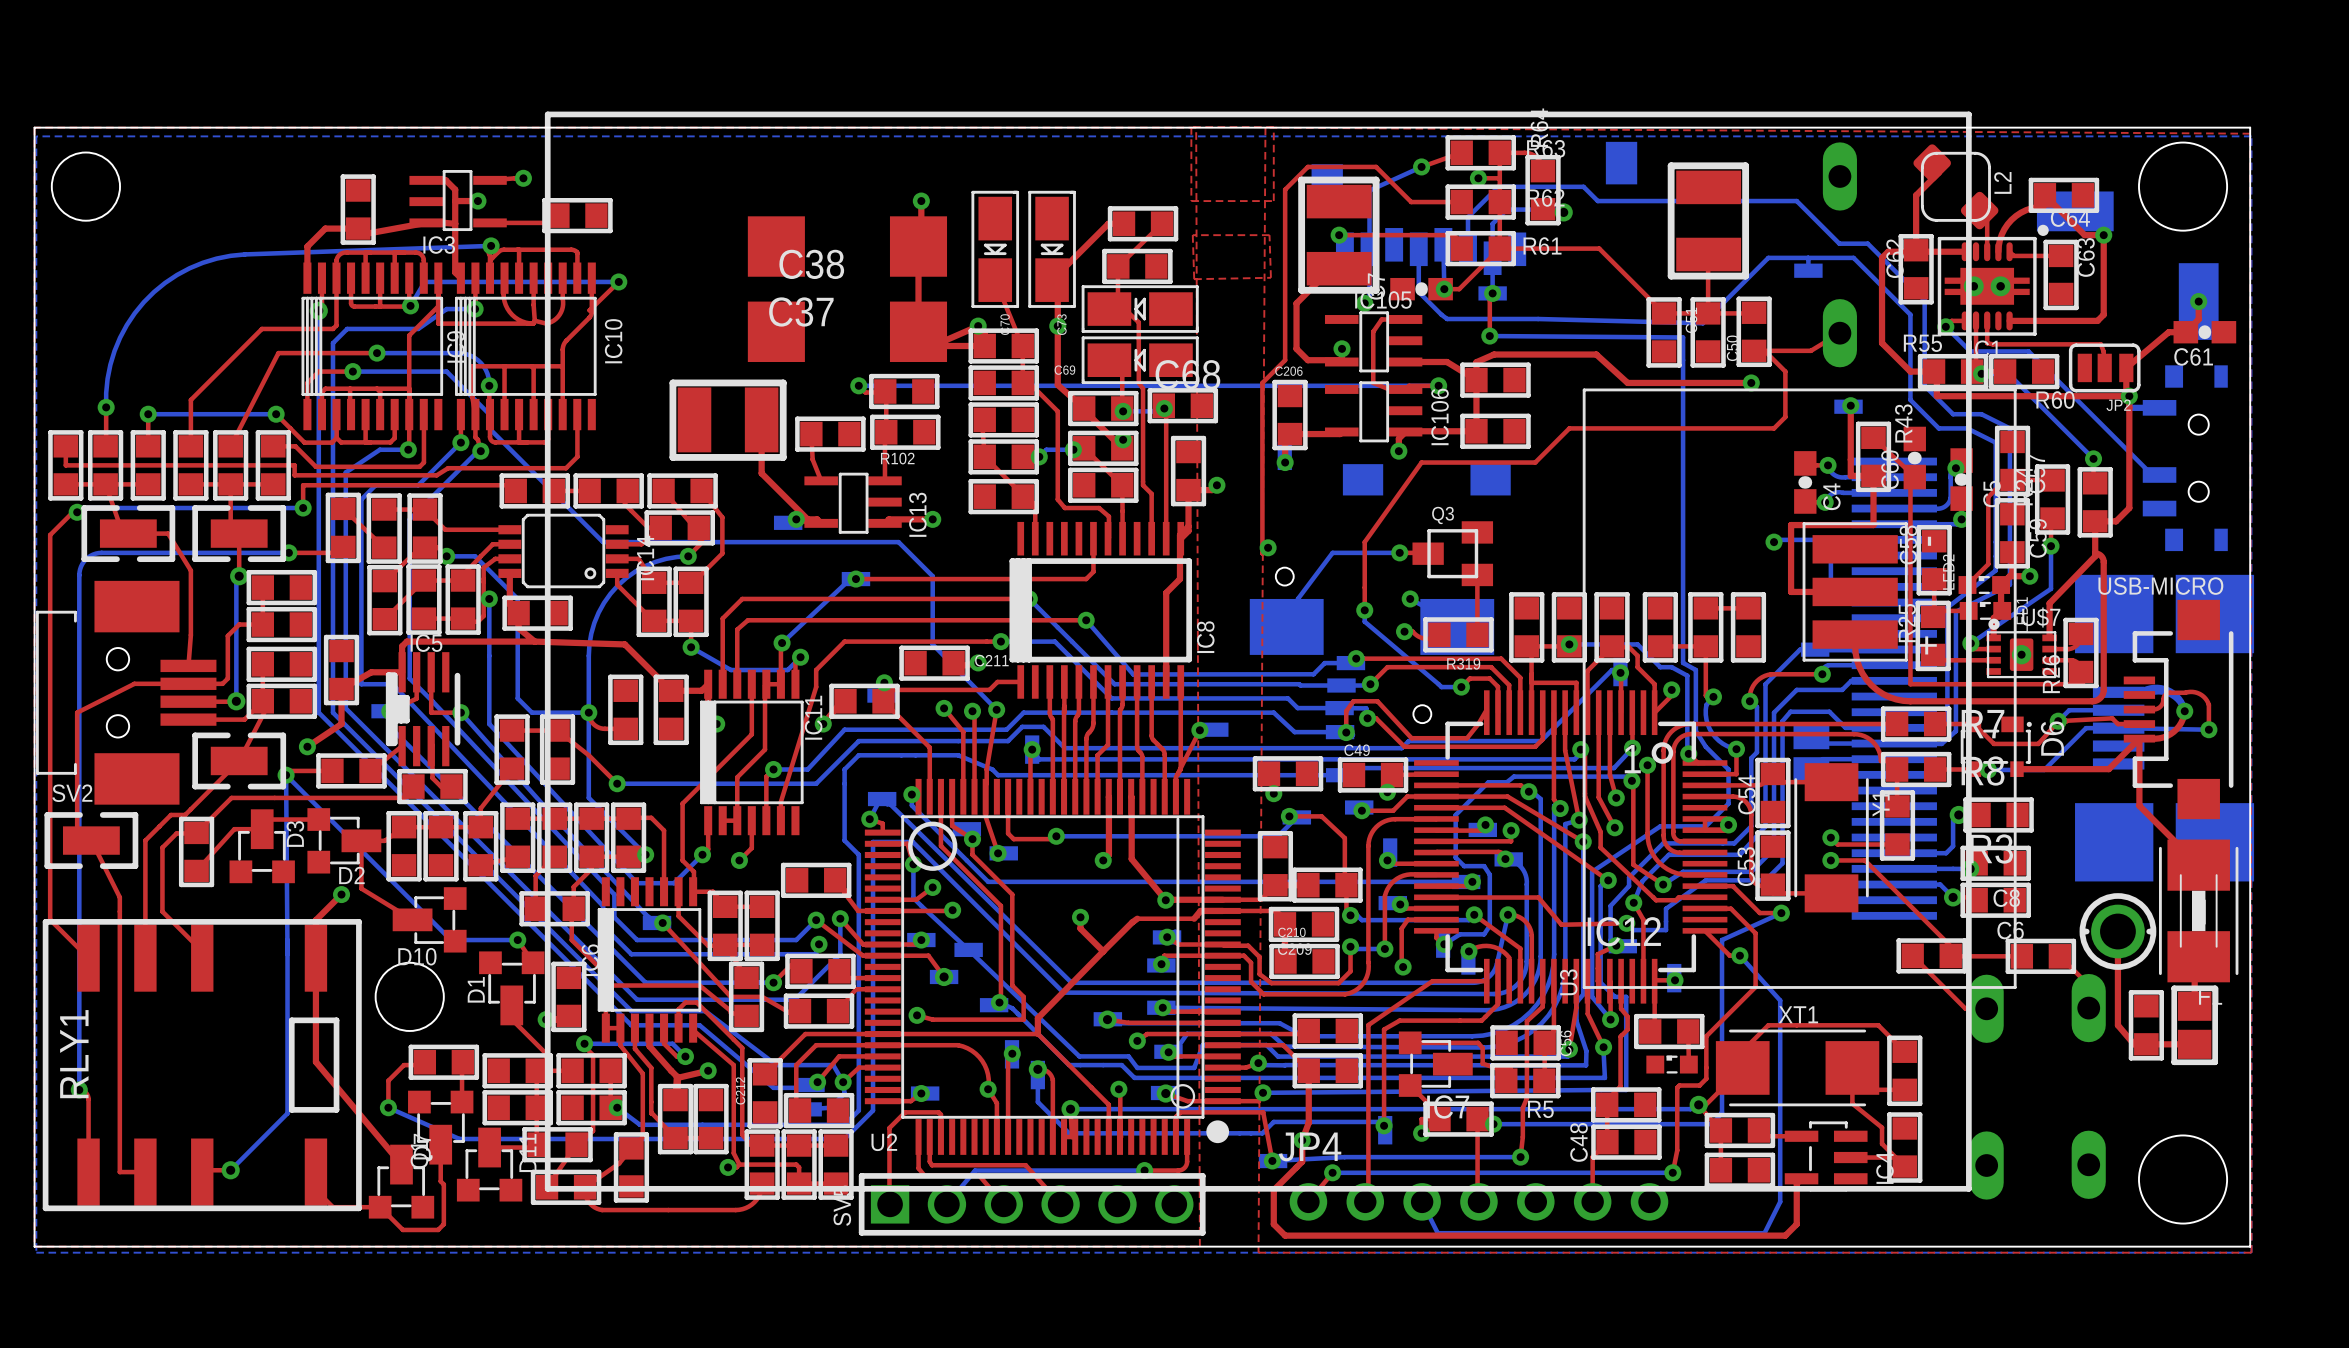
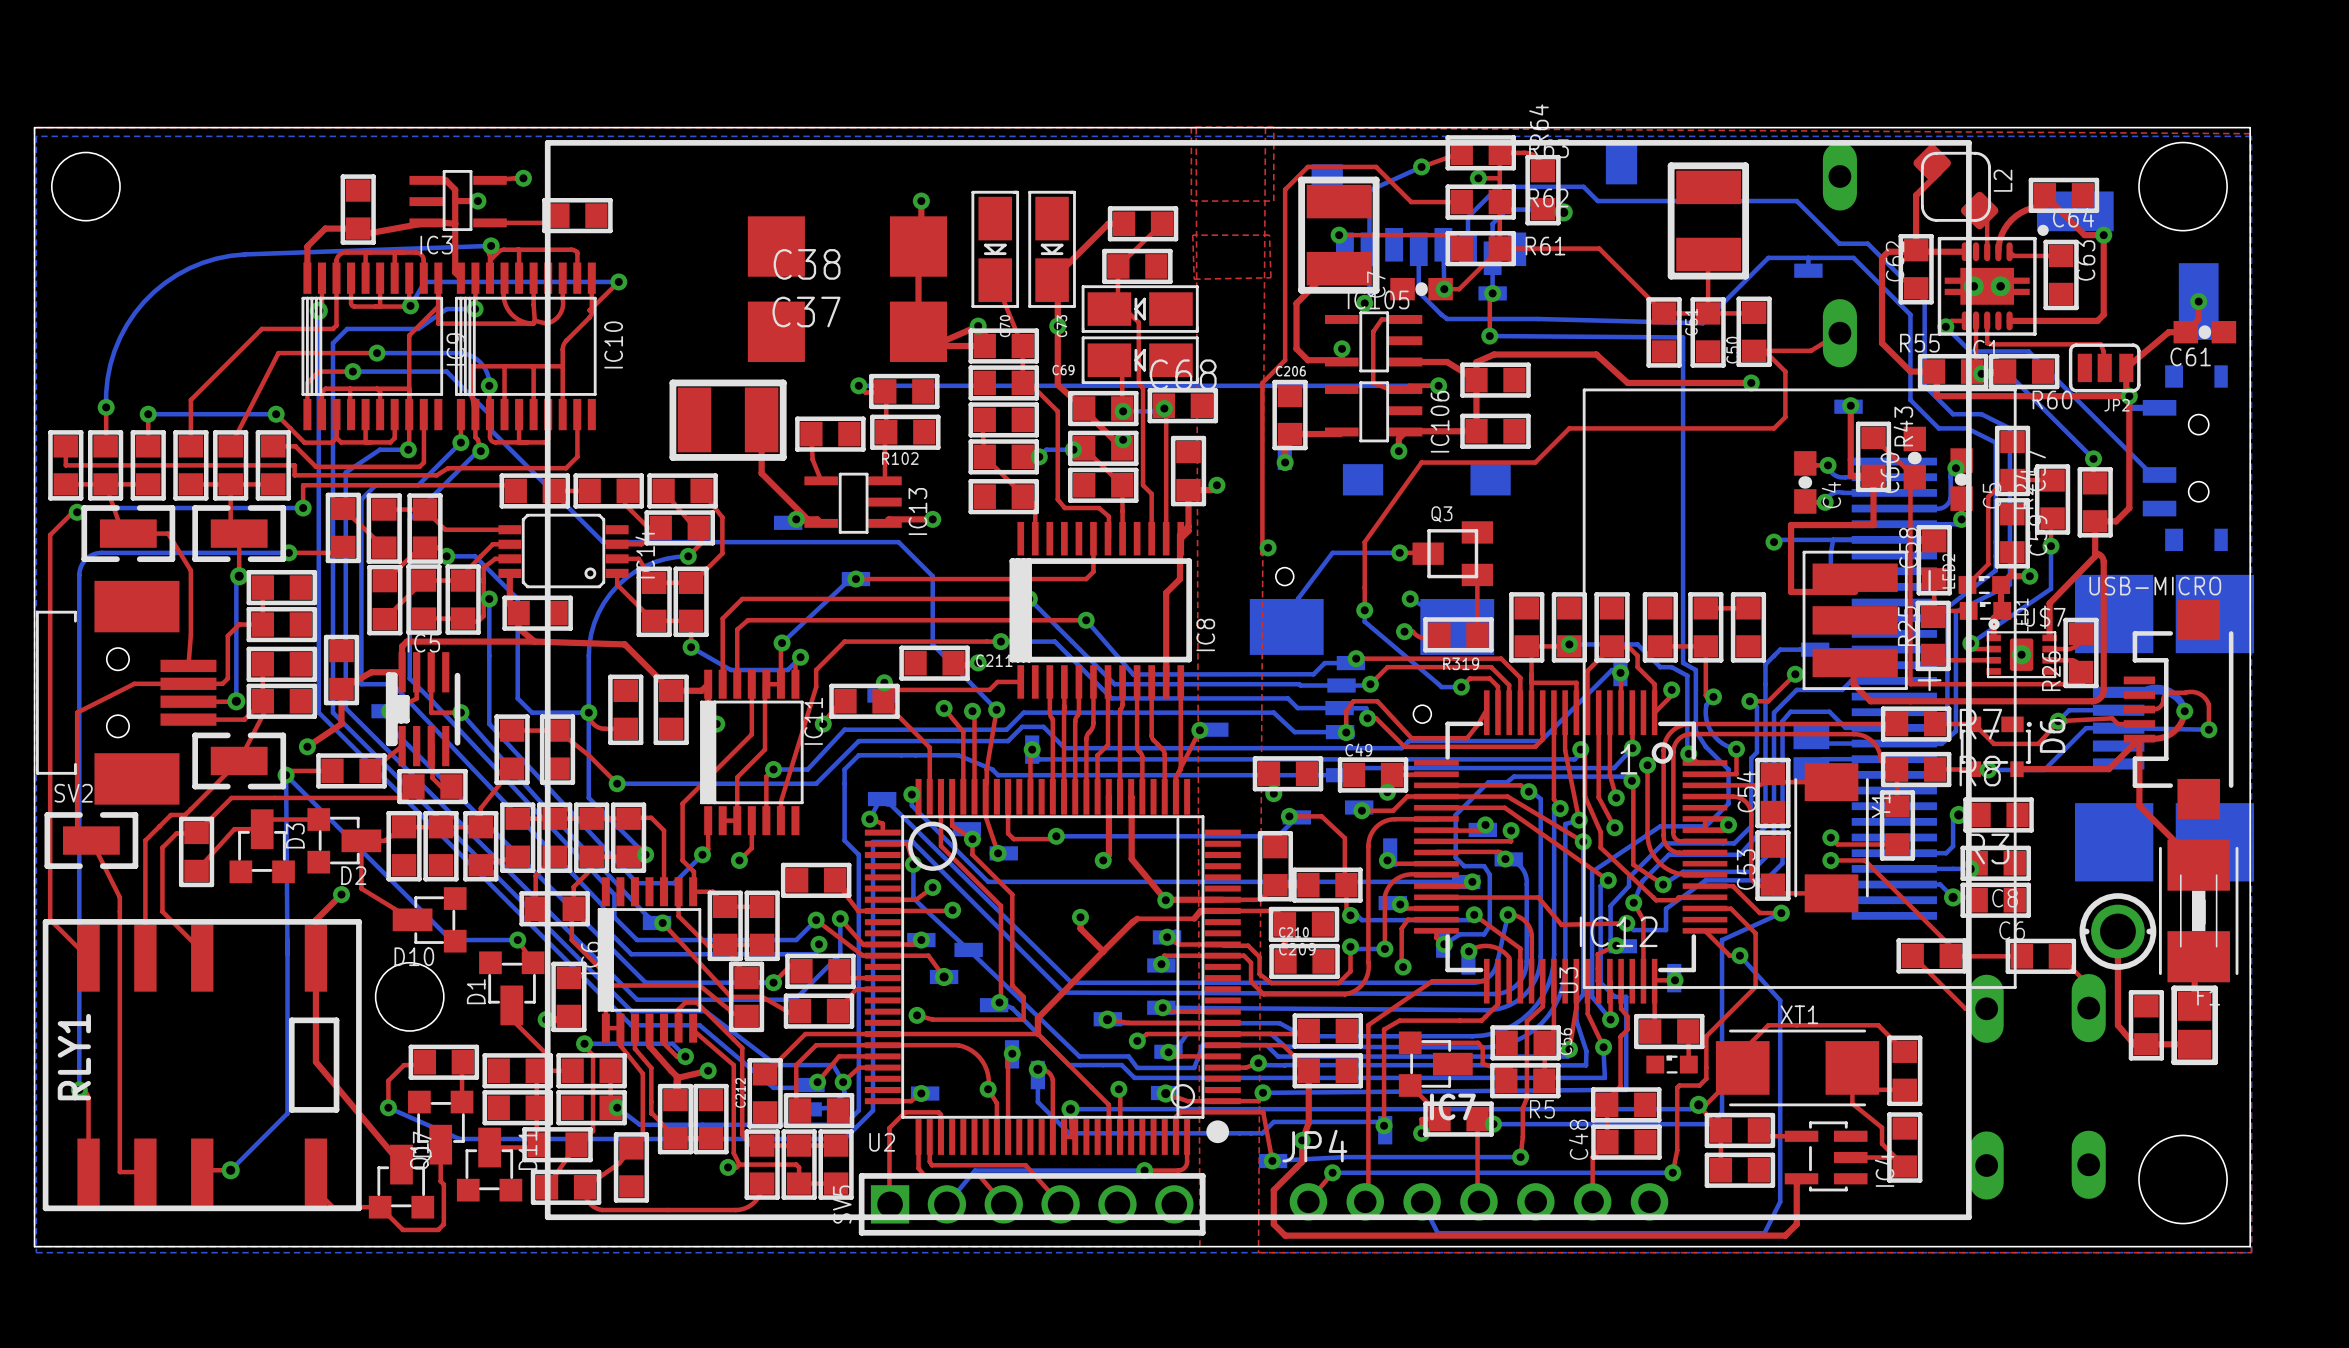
top track: (1855, 634) (1857, 660) (1866, 679) (1876, 689) (1889, 697) (1910, 701) -> (1855, 662) (1853, 684) (1870, 701) (1910, 701)
bottom track: (1800, 649) (1765, 684) -> (1800, 649) (1780, 649) (1765, 664) (1765, 684)
part position: (1258, 651) -> (1258, 680)
top track: (1822, 674) (1765, 675) (1753, 685) (1749, 701) -> (1795, 674) (1768, 701) (1749, 701)
via position: (1822, 674) -> (1795, 674)

